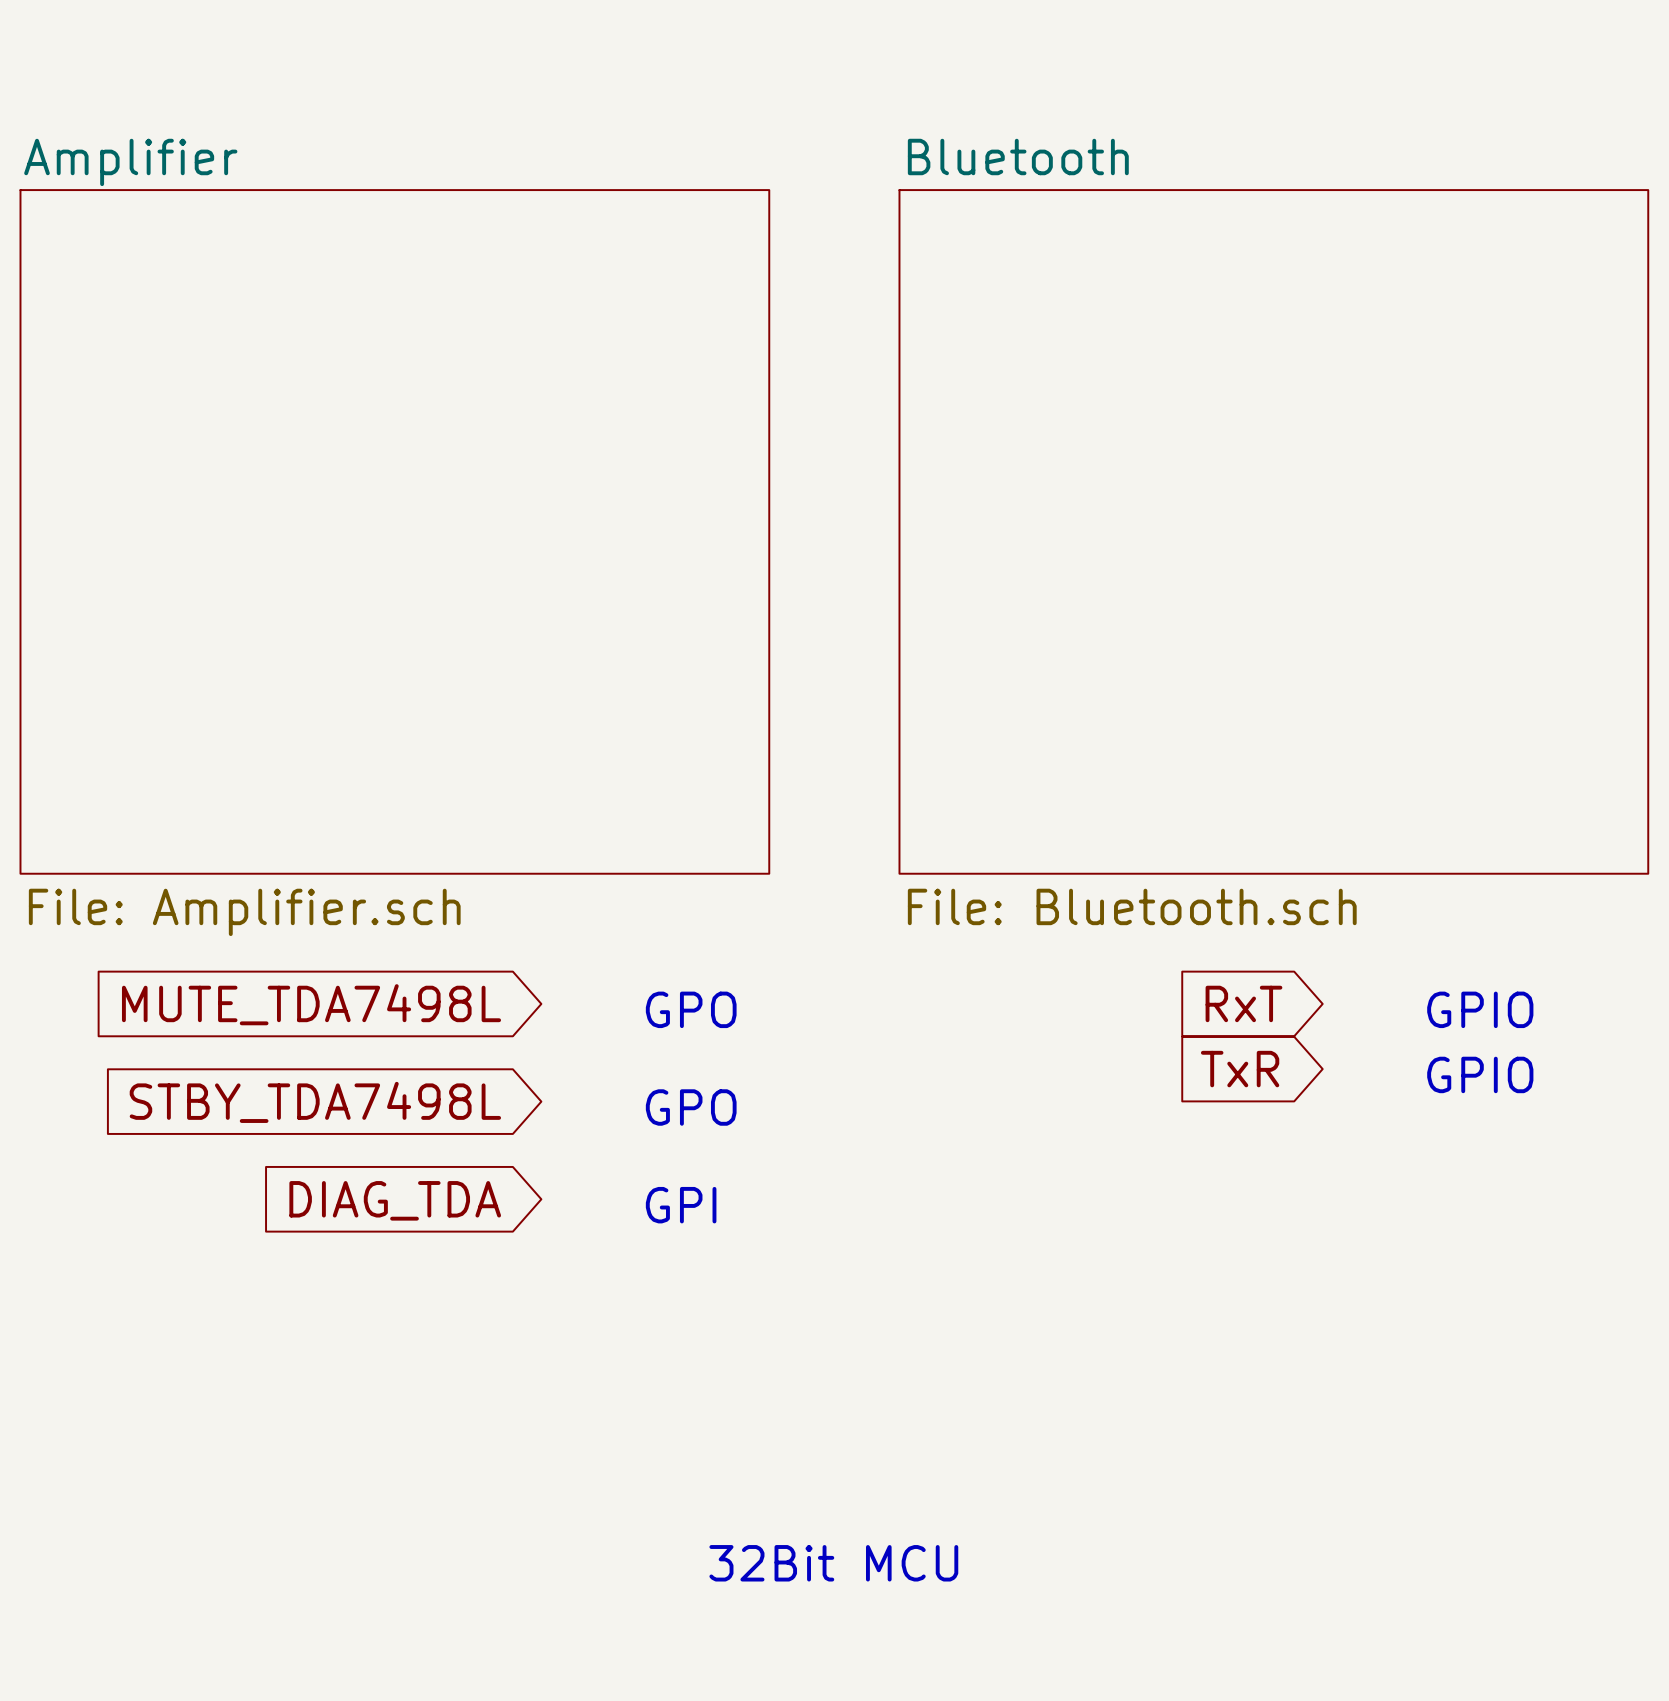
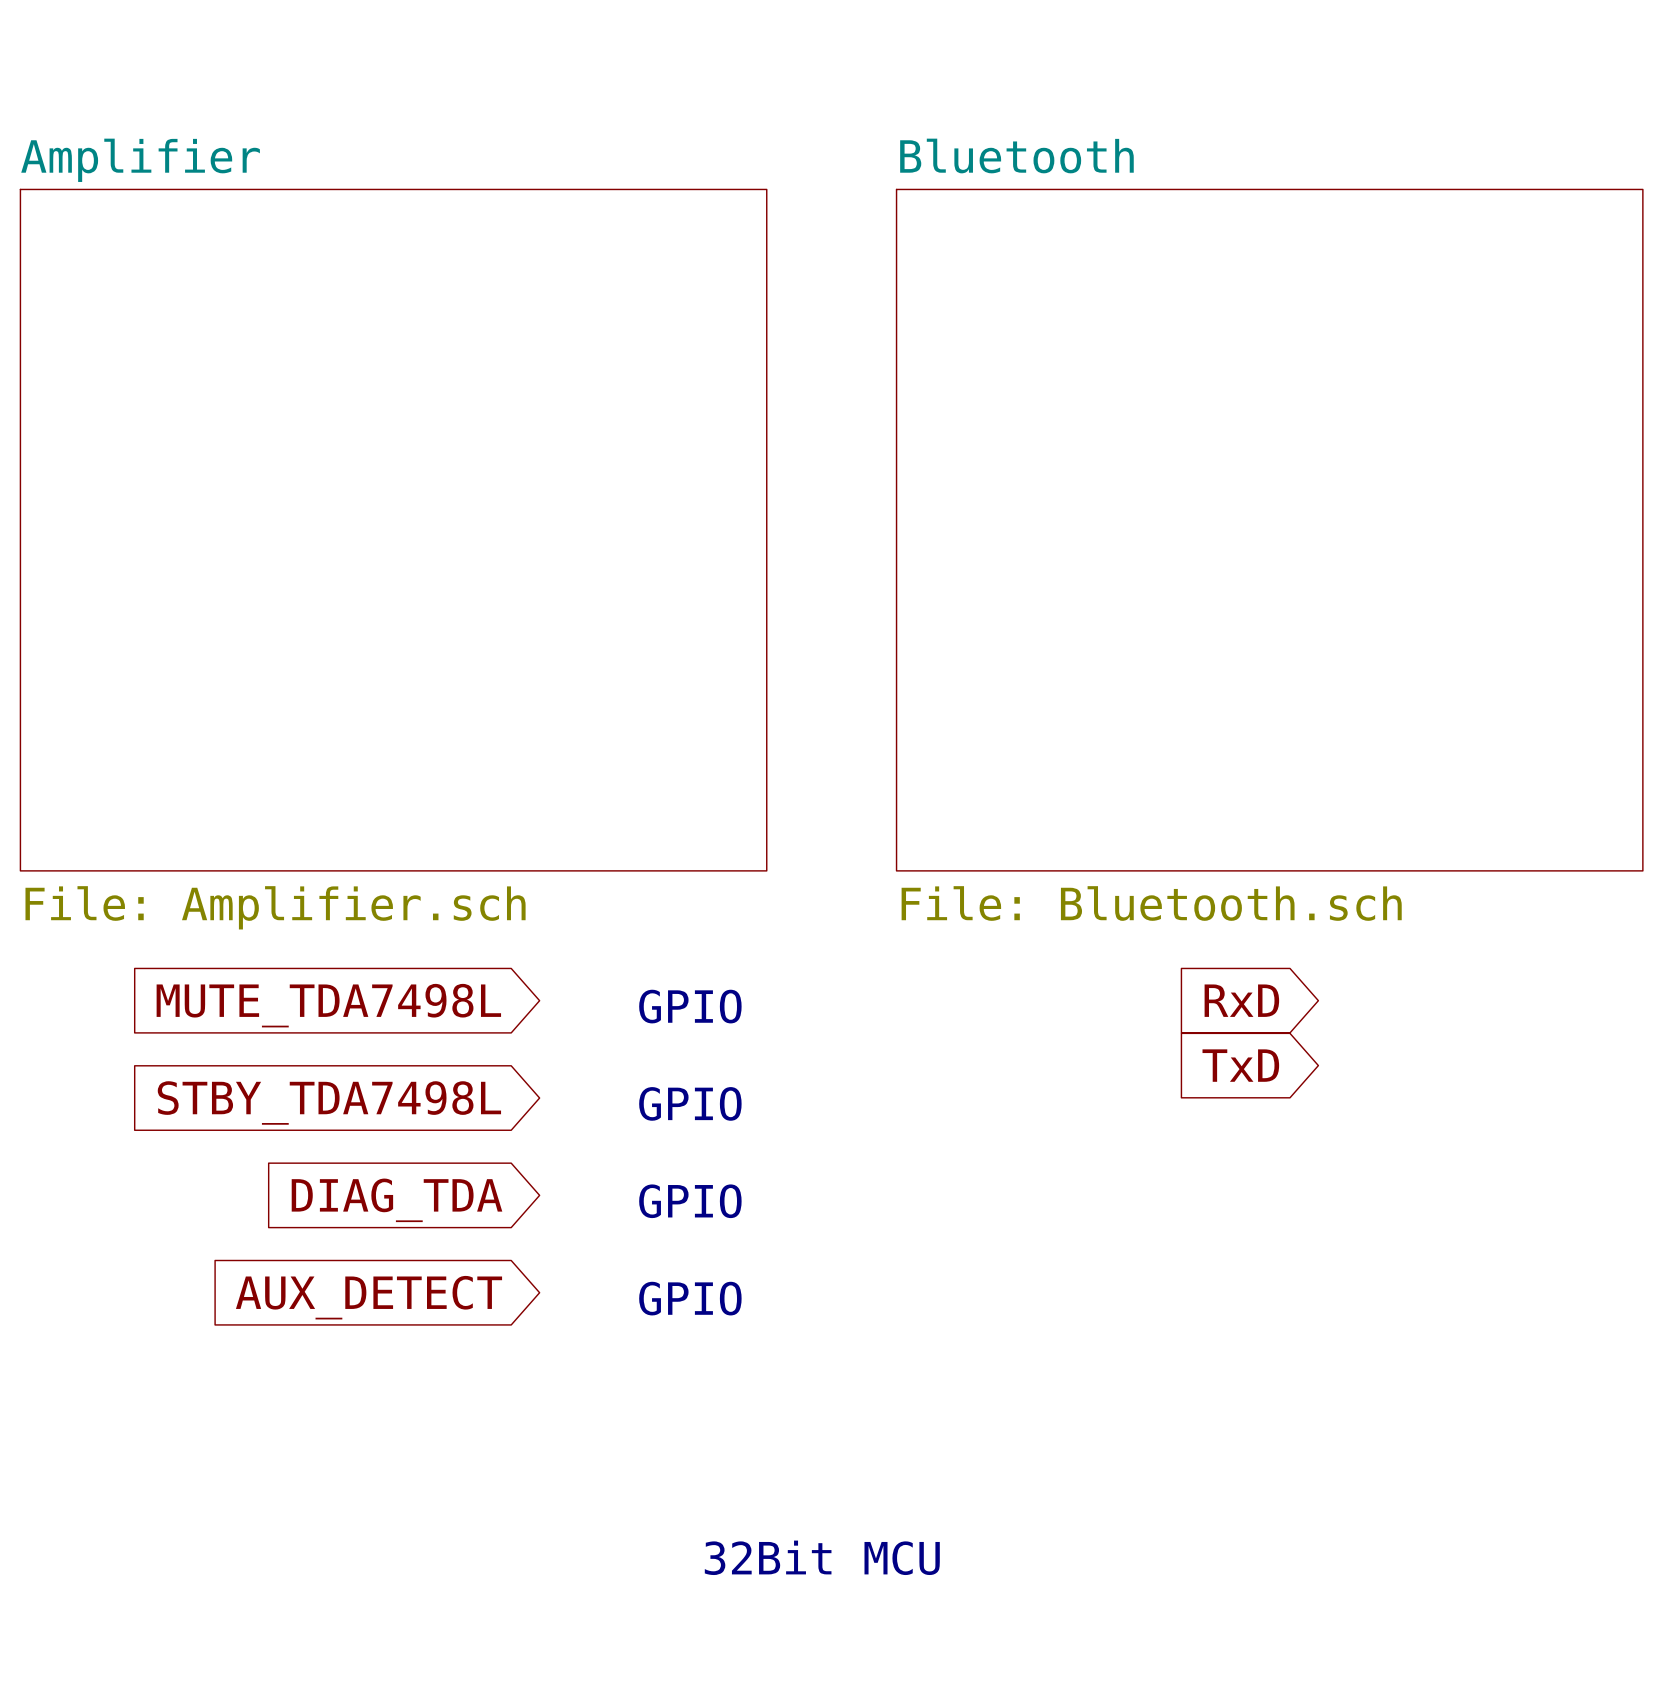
global label: RxT (1243, 1003) -> RxD (1241, 1000)
text: GPO (691, 1009) -> GPIO (690, 1006)
text: GPIO (1480, 1009) -> none
global label: TxR (1240, 1069) -> TxD (1240, 1065)
text: GPIO (1480, 1074) -> none
text: GPO (691, 1107) -> GPIO (690, 1103)
text: GPI (681, 1205) -> GPIO (690, 1201)
global label: none -> AUX_DETECT (369, 1297)
text: none -> GPIO (690, 1298)

